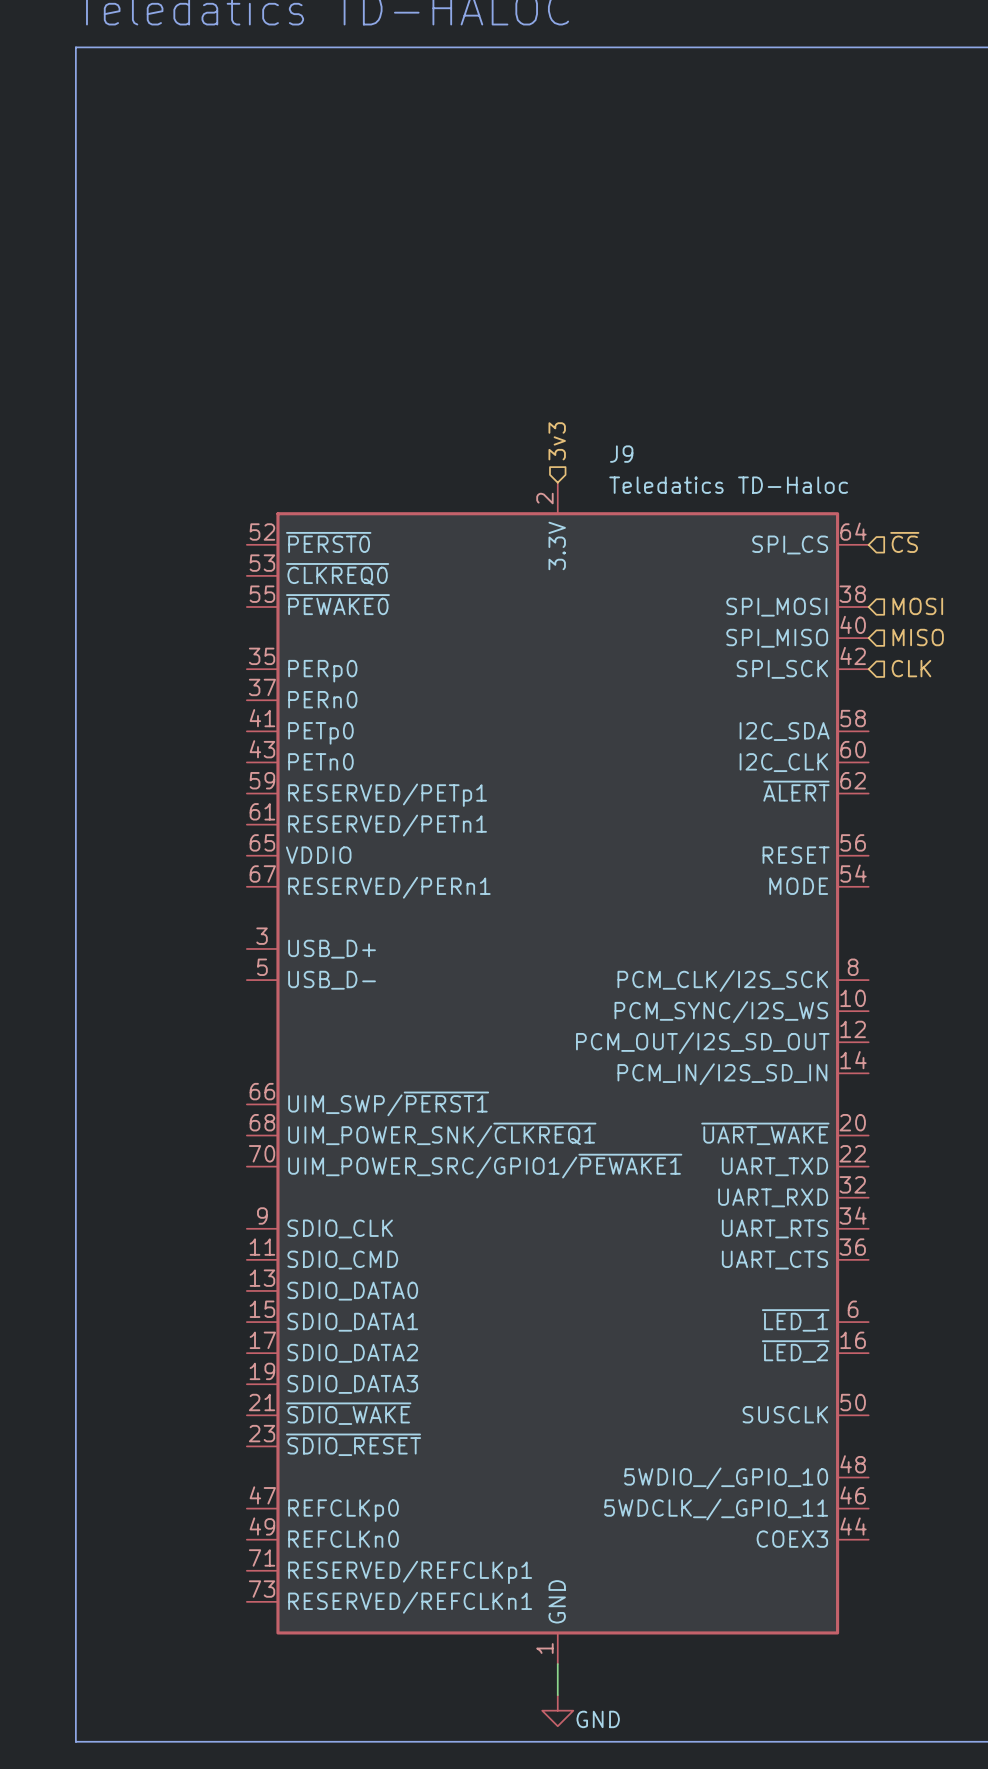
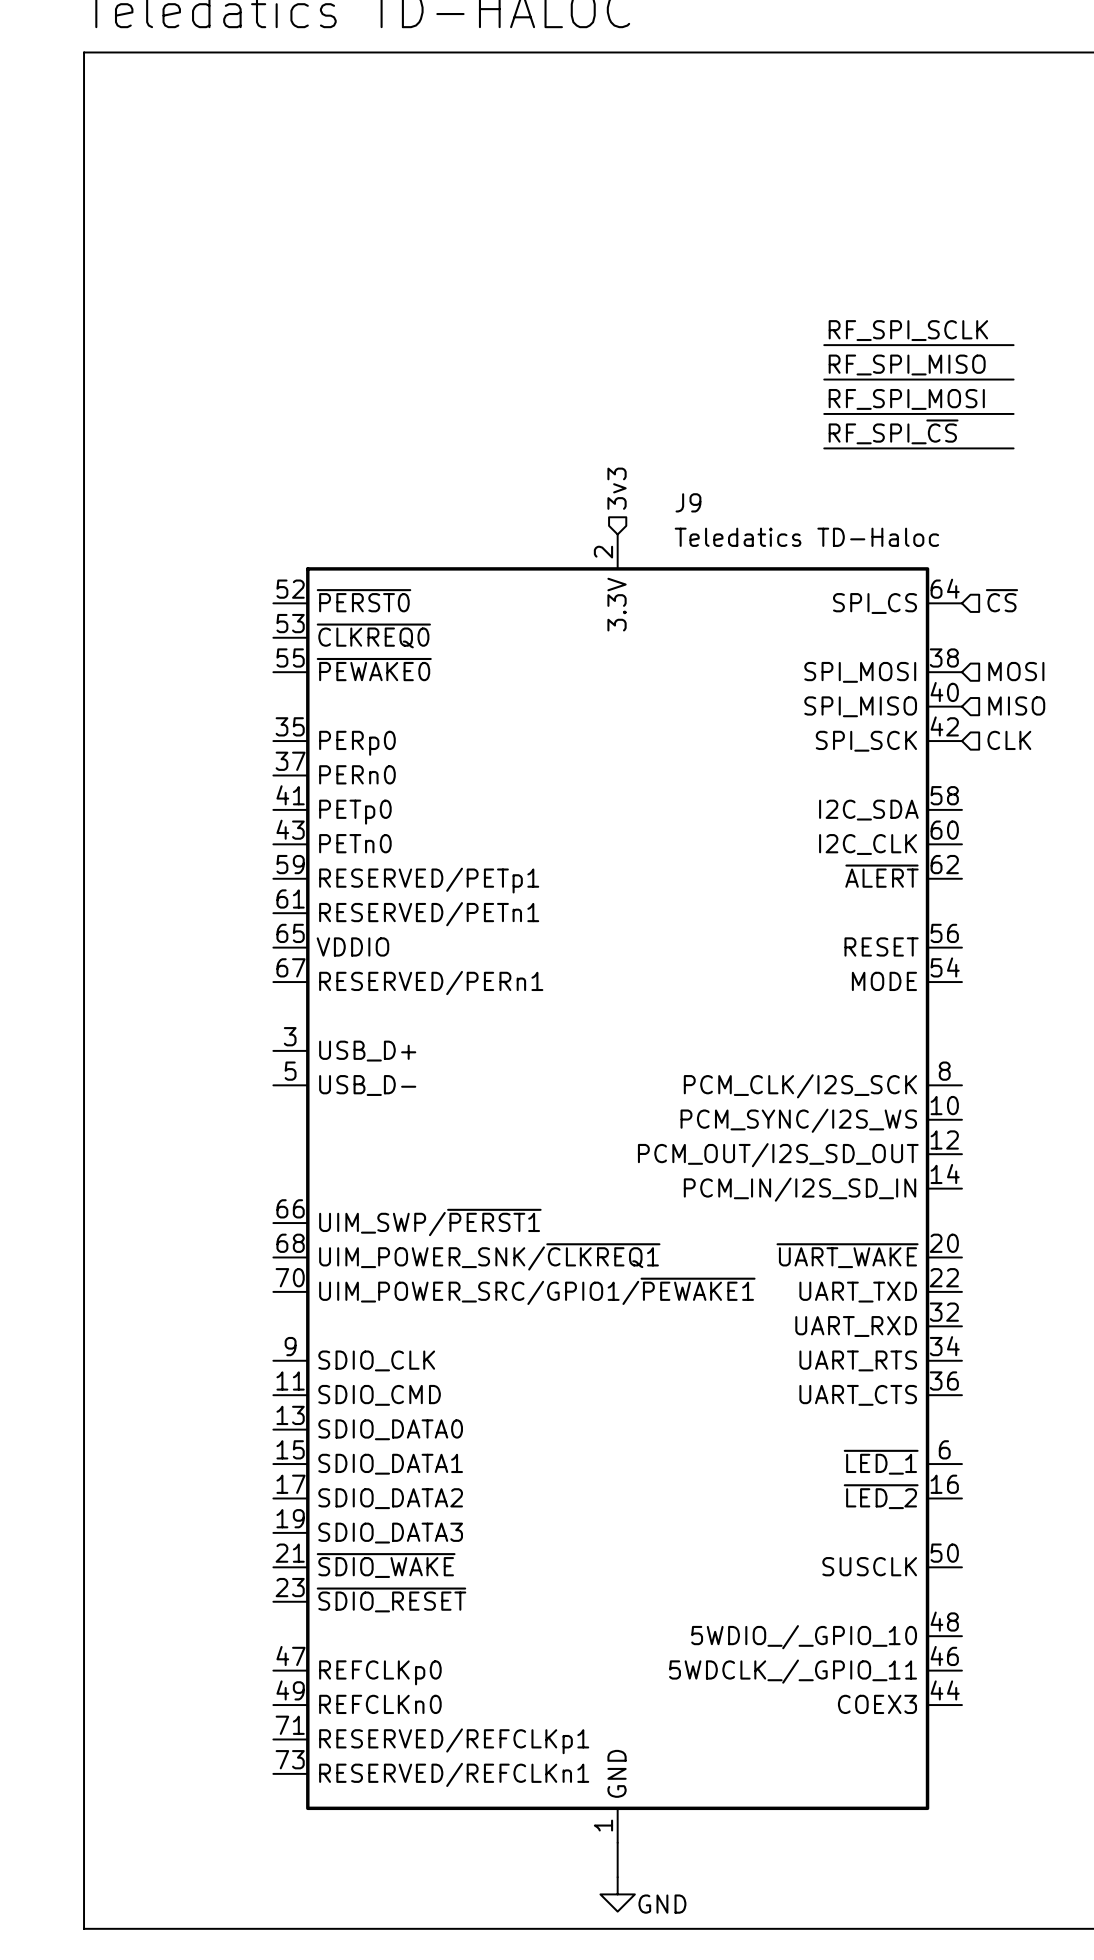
label: none -> RF_SPI_SCLK (908, 330)
wire: none -> (824, 345) (1013, 345)
label: none -> RF_SPI_MISO (907, 365)
wire: none -> (824, 379) (1013, 379)
label: none -> RF_SPI_MOSI (906, 399)
wire: none -> (824, 413) (1013, 413)
label: none -> RF_SPI_~{CS} (893, 431)
wire: none -> (824, 448) (1013, 448)

